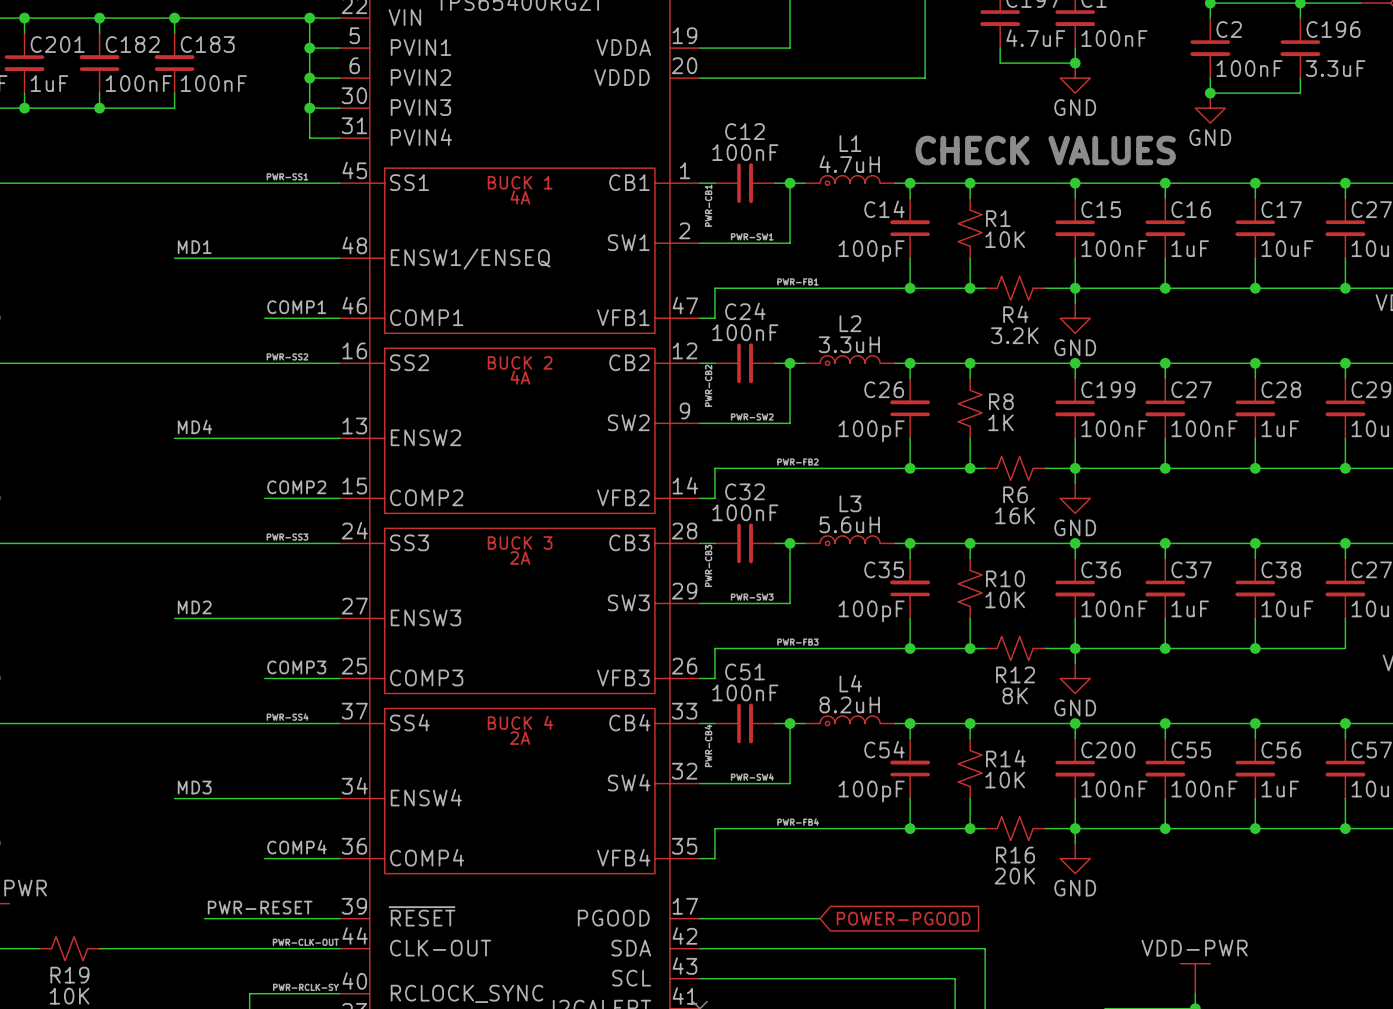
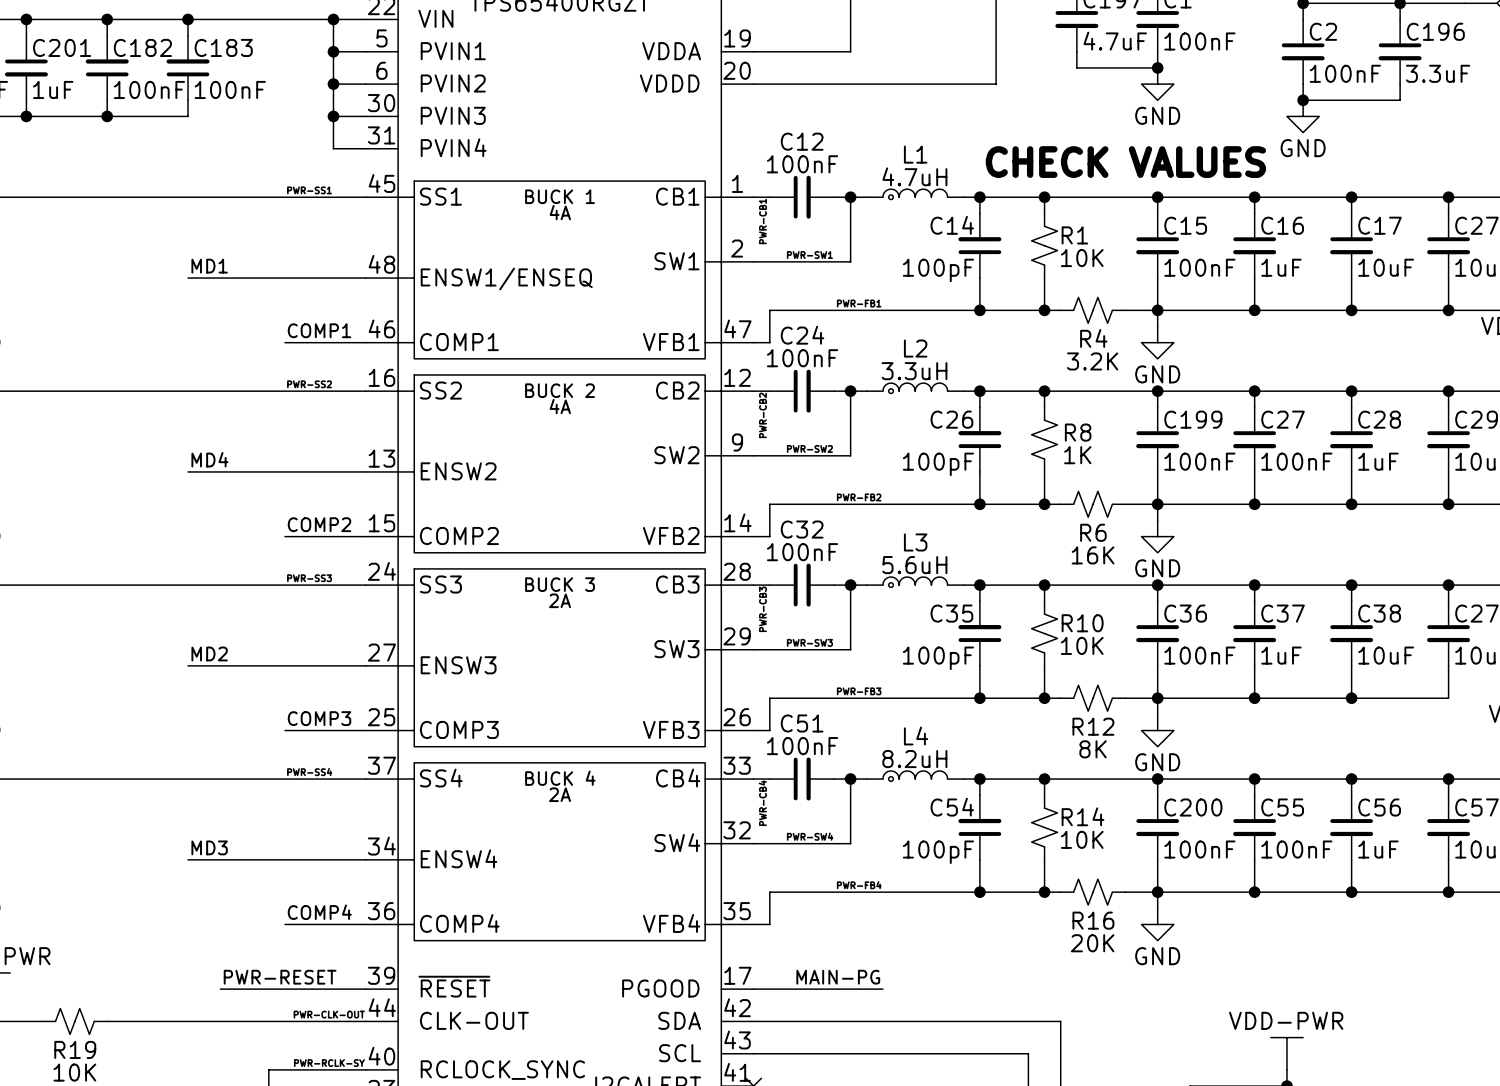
label: none -> MAIN-PG (838, 977)
global label: POWER-PGOOD (903, 918) -> none

